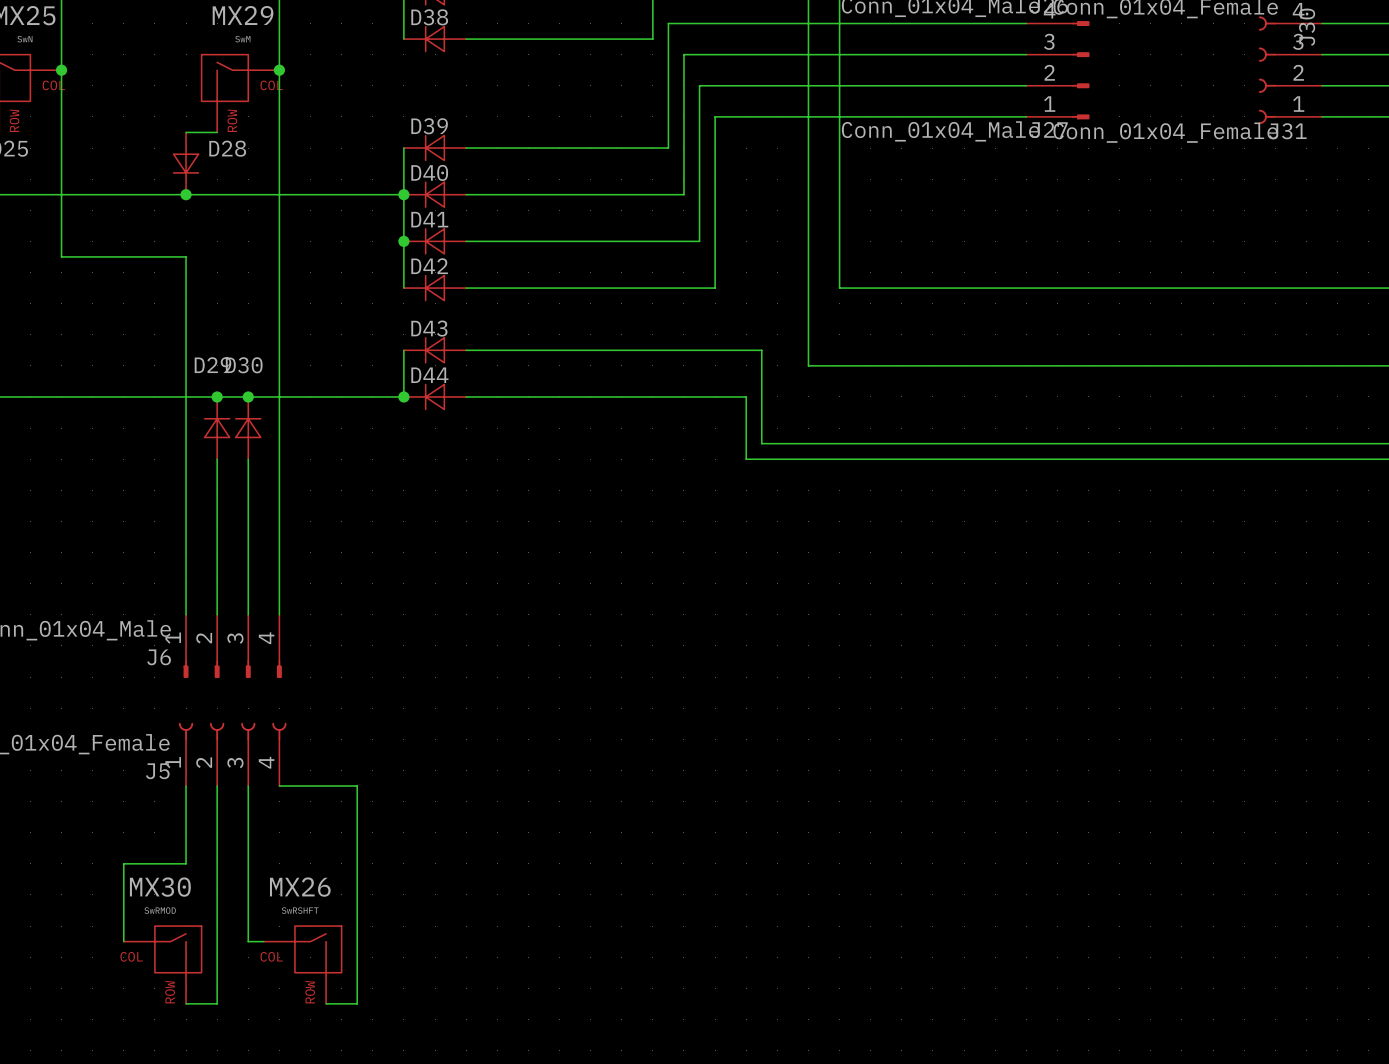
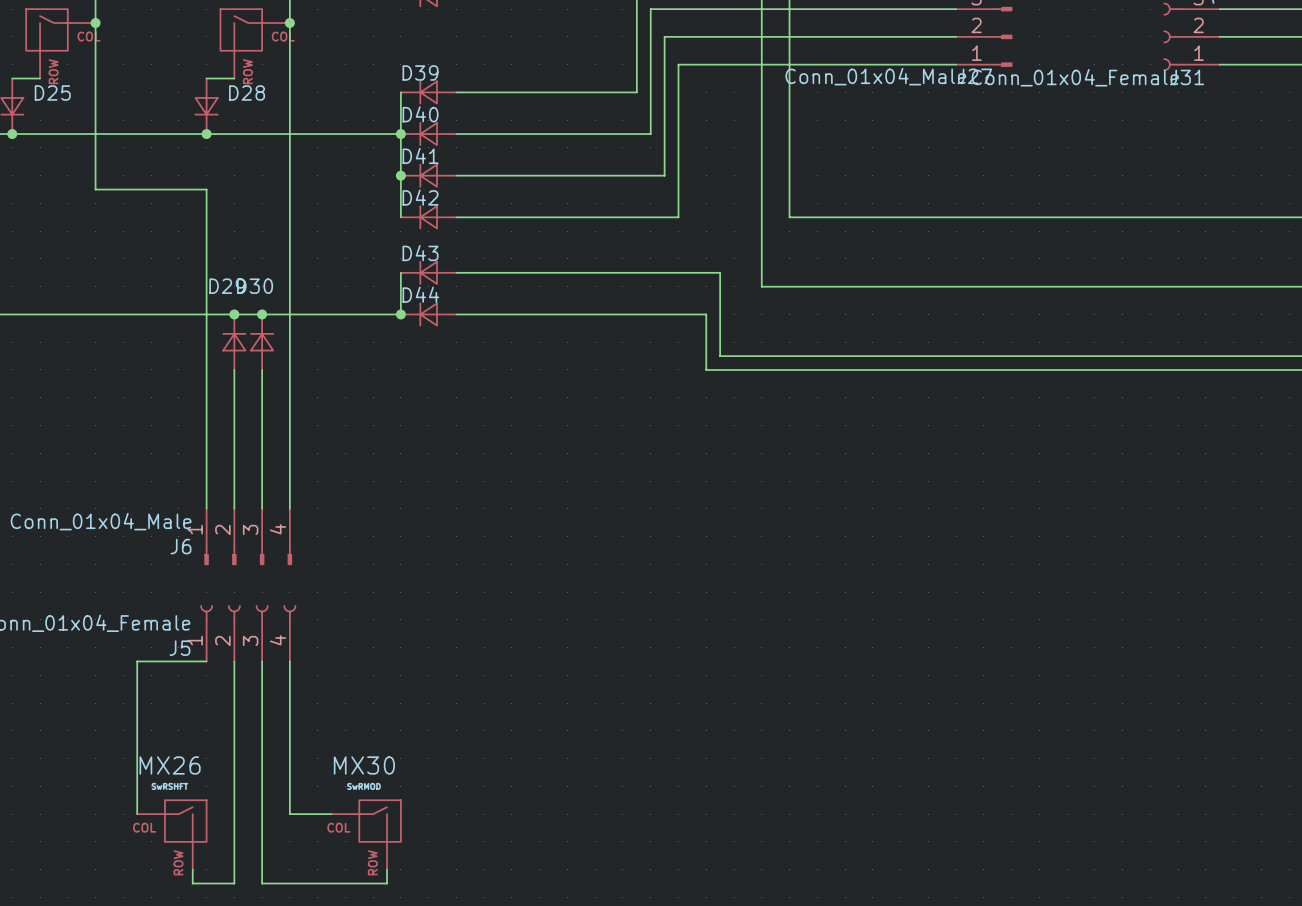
wire: (186, 786) (186, 863) (123, 863) (123, 941) -> (206, 661) (137, 661) (137, 814)
wire: (279, 786) (357, 786) (357, 1003) (326, 1003) -> (289, 661) (289, 814) (331, 814)
wire: (248, 941) (263, 941) -> (262, 800) (262, 883) (387, 883) (387, 869)
MX30 position: (162, 964) -> (366, 834)
MX26 position: (302, 964) -> (171, 834)
wire: (186, 1003) (217, 1003) -> (192, 869) (192, 883) (234, 883) (234, 855)

